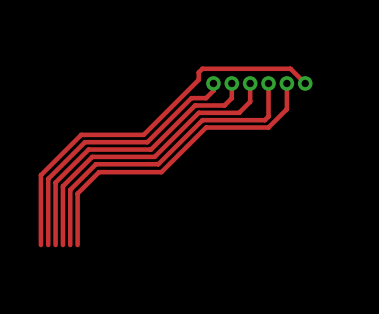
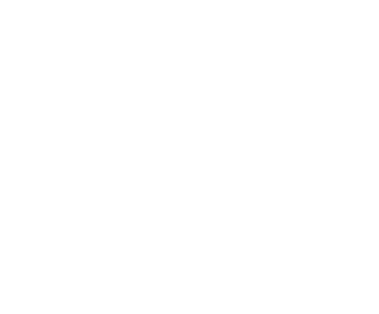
top track: (213, 83) (213, 90) (206, 98) (191, 98) (147, 142) (84, 142) (48, 178) (48, 245) -> none
via: (213, 83) -> none
top track: (231, 83) (231, 98) (224, 105) (195, 105) (151, 149) (88, 149) (55, 182) (55, 245) -> none
via: (231, 83) -> none
top track: (250, 83) (250, 101) (239, 112) (198, 112) (154, 156) (92, 156) (62, 186) (62, 245) -> none
via: (250, 83) -> none
top track: (268, 83) (268, 116) (264, 120) (202, 120) (158, 164) (95, 164) (70, 189) (70, 245) -> none
via: (268, 83) -> none
top track: (286, 83) (286, 109) (268, 127) (206, 127) (161, 172) (99, 172) (77, 193) (77, 245) -> none
via: (286, 83) -> none
top track: (305, 83) (290, 68) (202, 68) (198, 72) (198, 79) (143, 134) (81, 134) (40, 175) (40, 245) -> none
via: (305, 83) -> none

